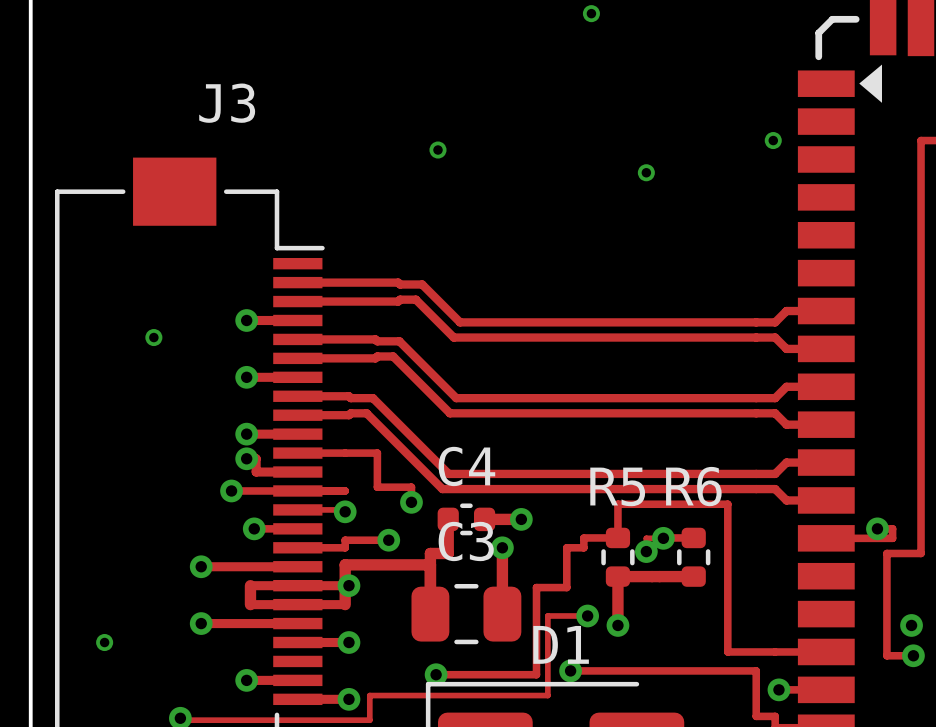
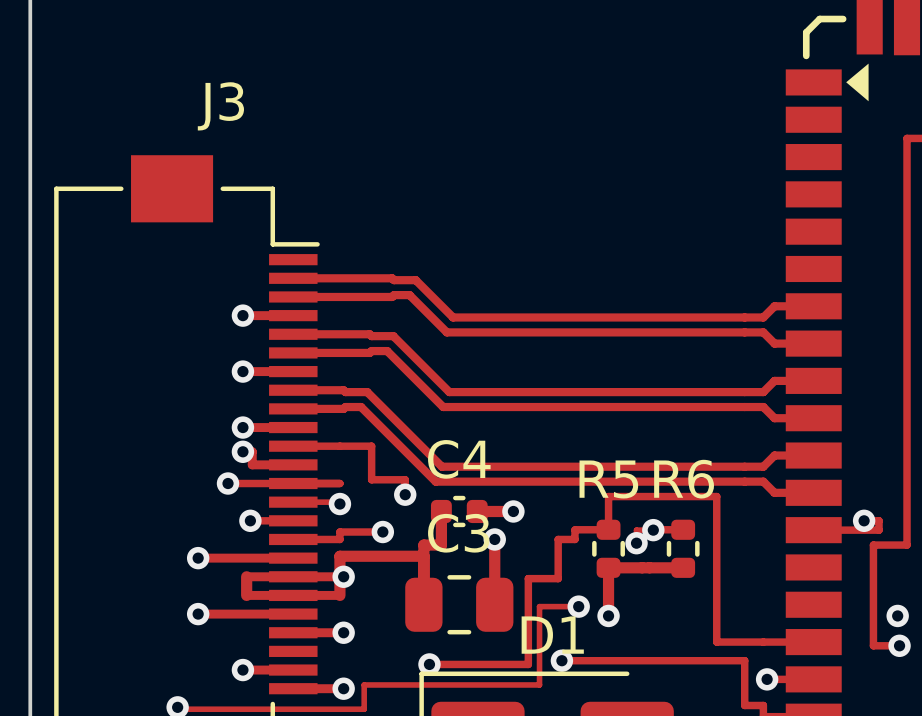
via: (591, 13) -> none
via: (773, 140) -> none
via: (438, 150) -> none
via: (646, 172) -> none
via: (153, 337) -> none
via: (104, 642) -> none

